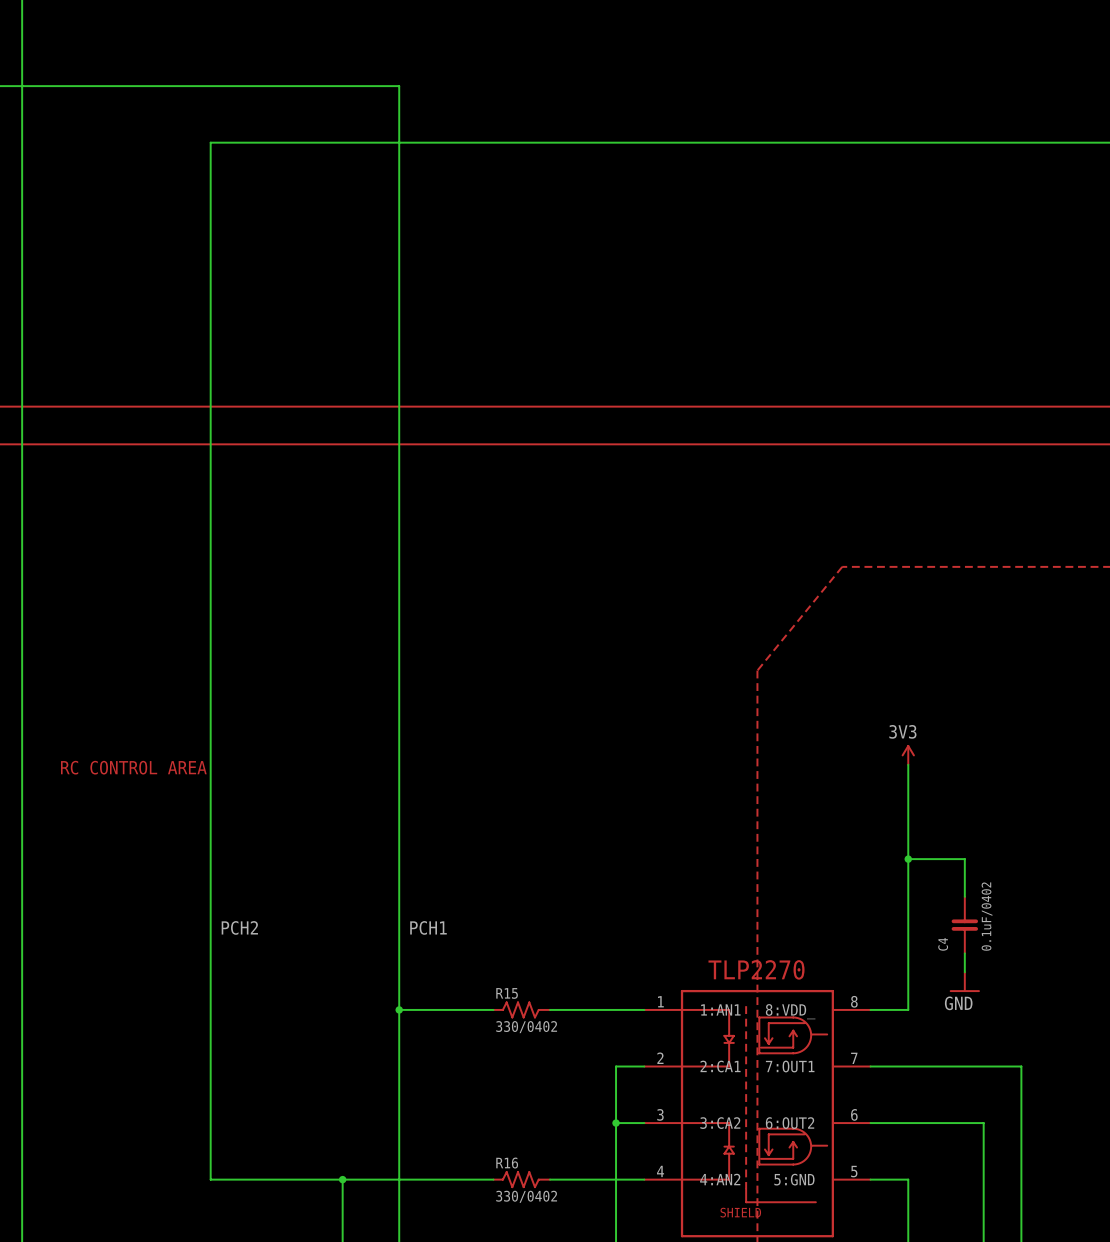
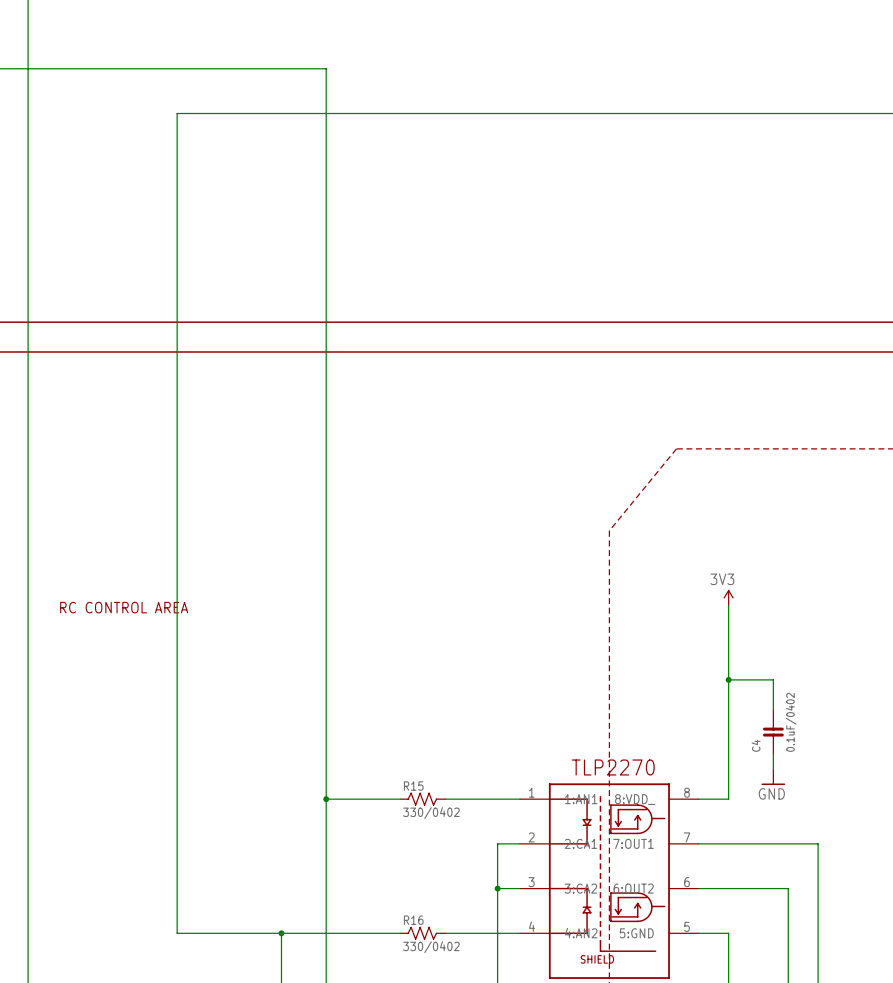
label: PCH2 (239, 927) -> none
label: PCH1 (428, 927) -> none

